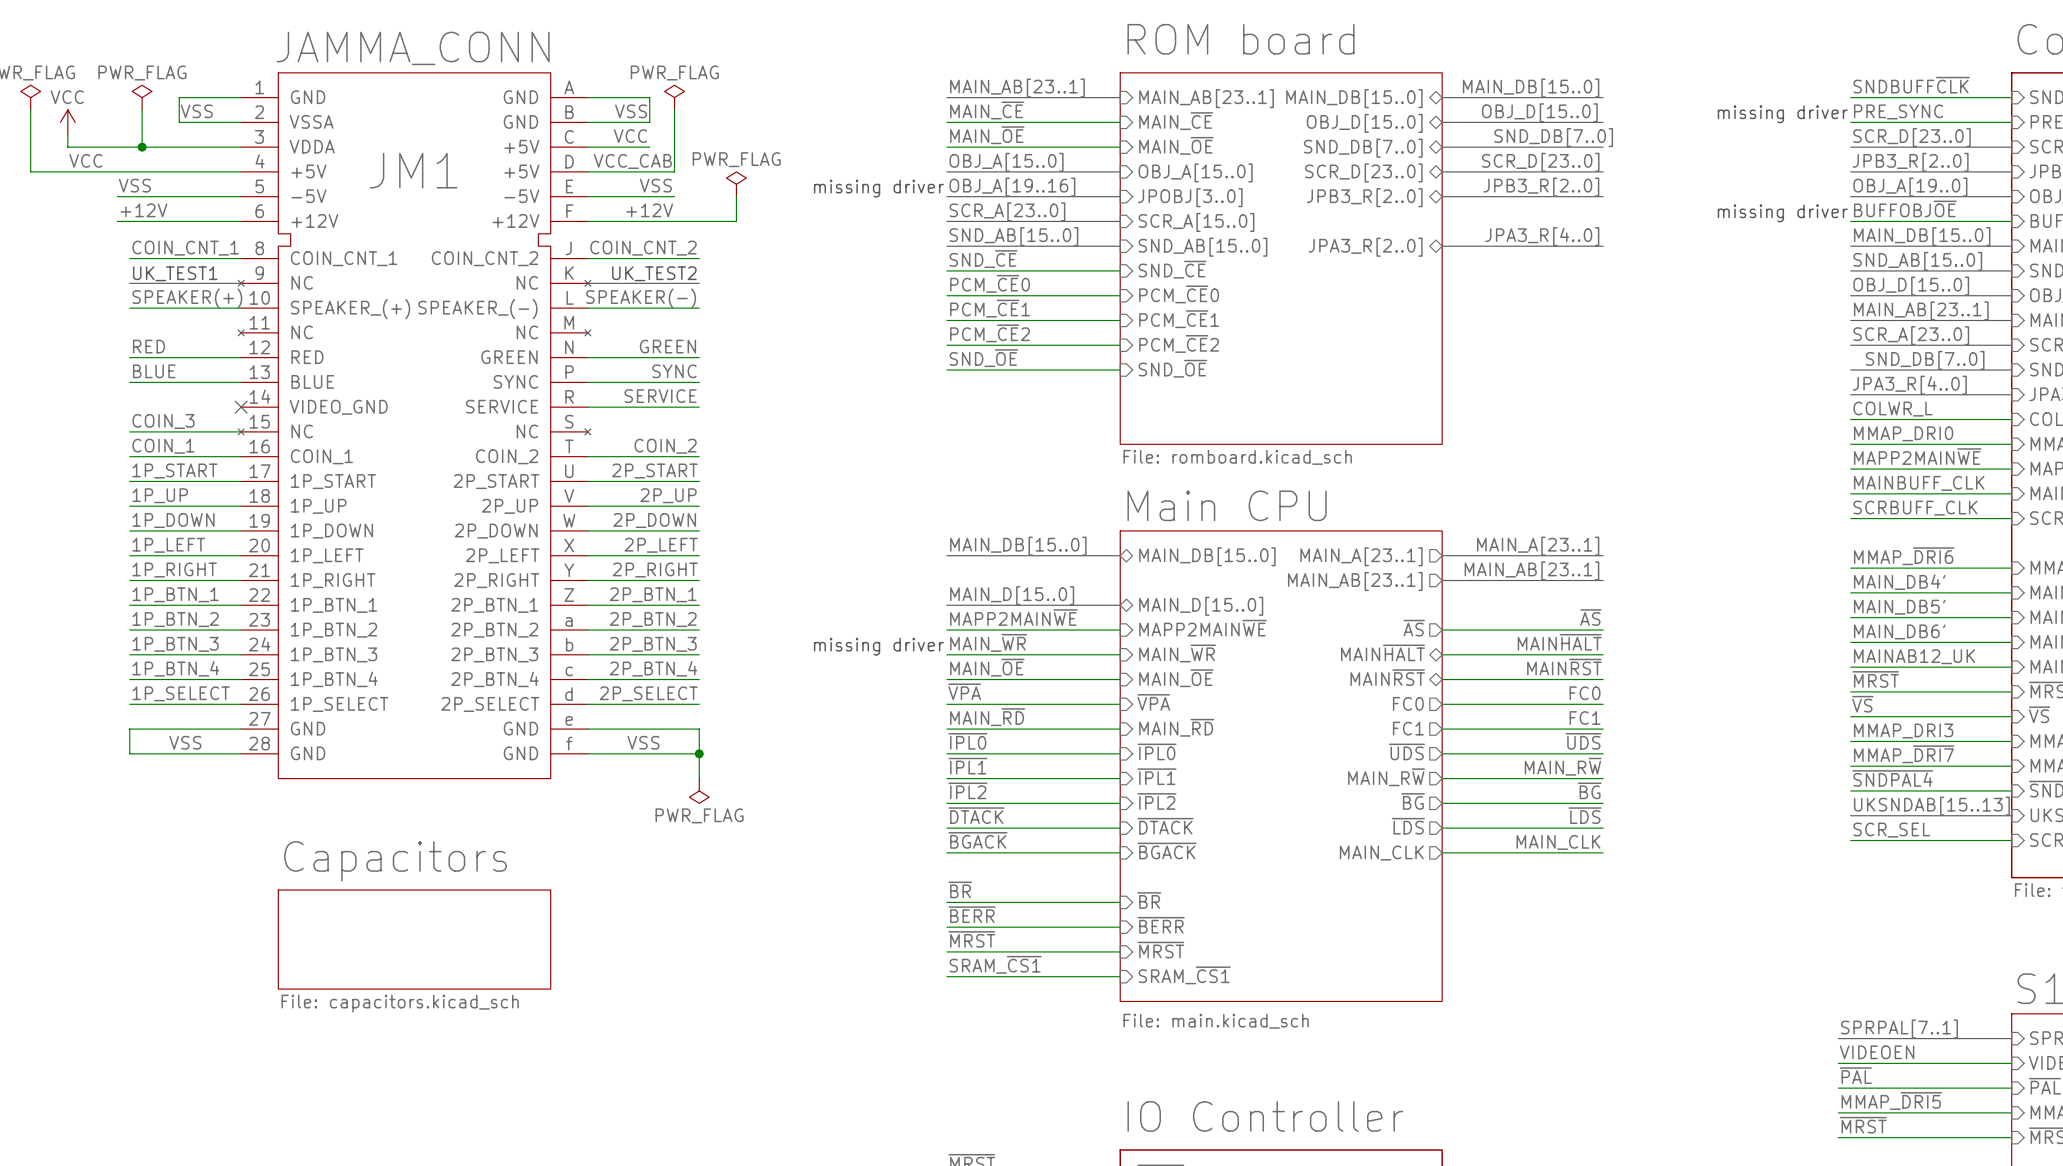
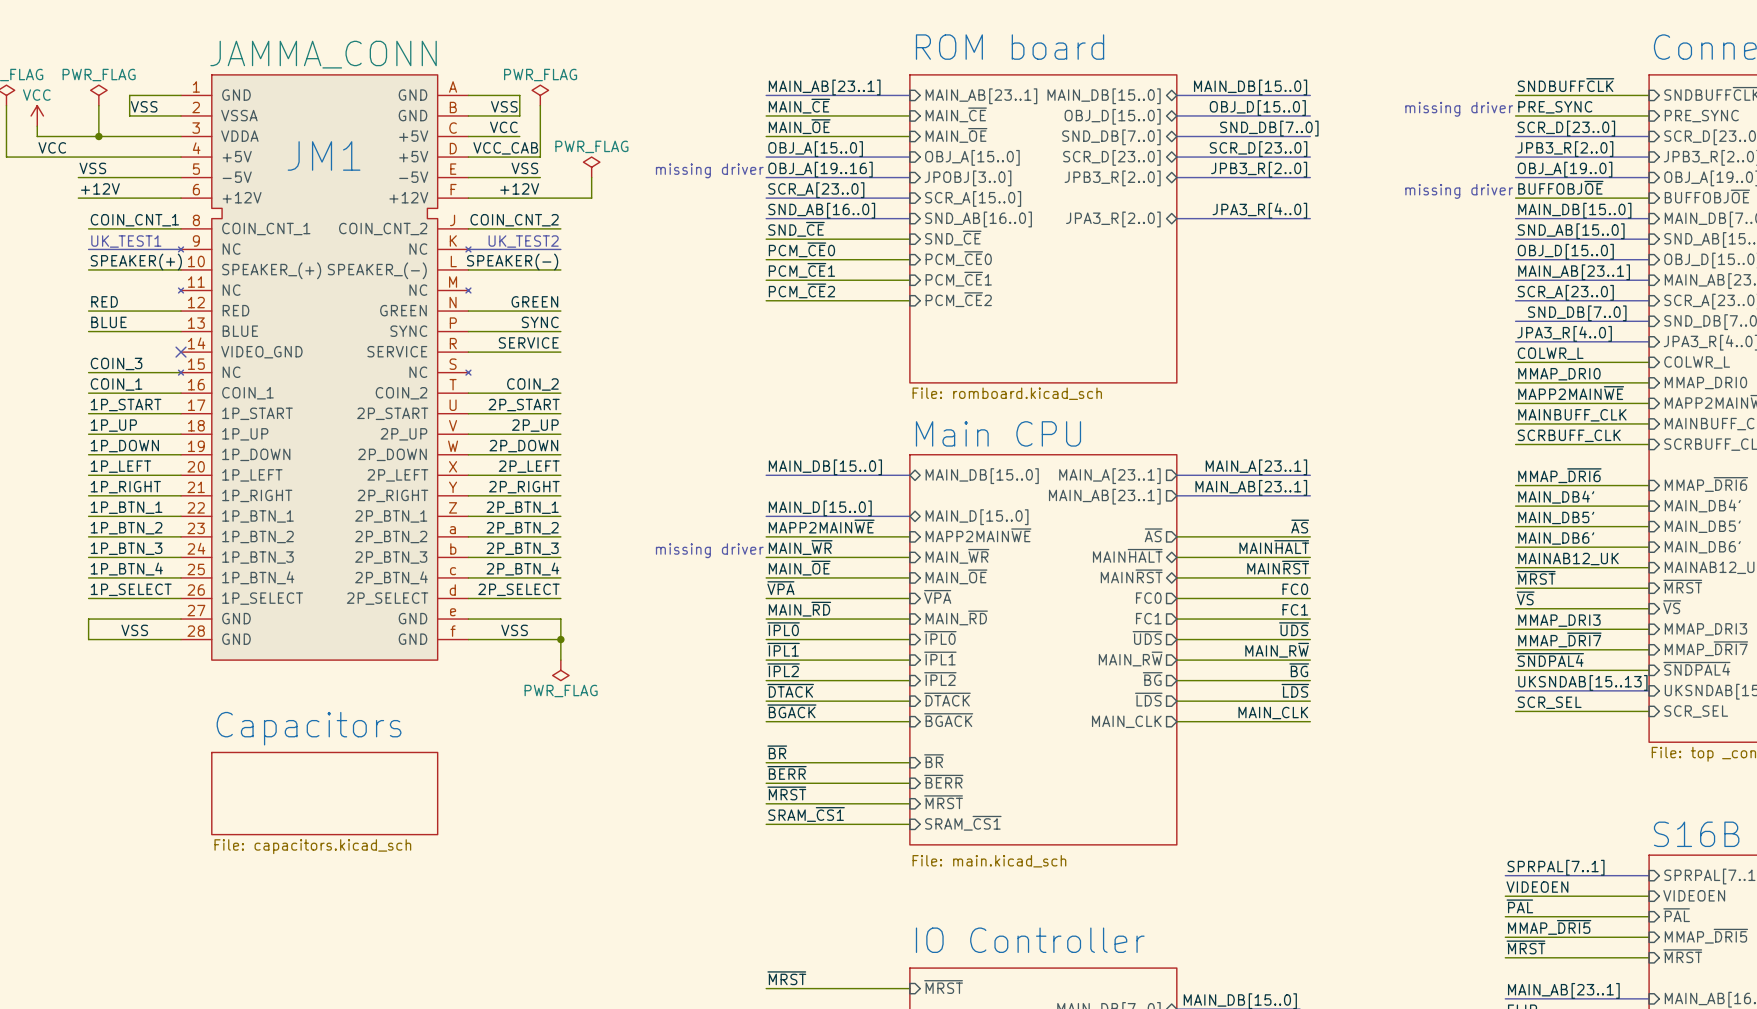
label: SND_AB[15..0] (1013, 236) -> SND_AB[16..0] (821, 210)
sheet pin: SND_AB[15..0] (1202, 247) -> SND_AB[16..0] (978, 219)
label: SND_~{OE} (983, 358) -> none
sheet pin: SND_~{OE} (1172, 368) -> none
wire: (946, 370) (1120, 370) -> none

